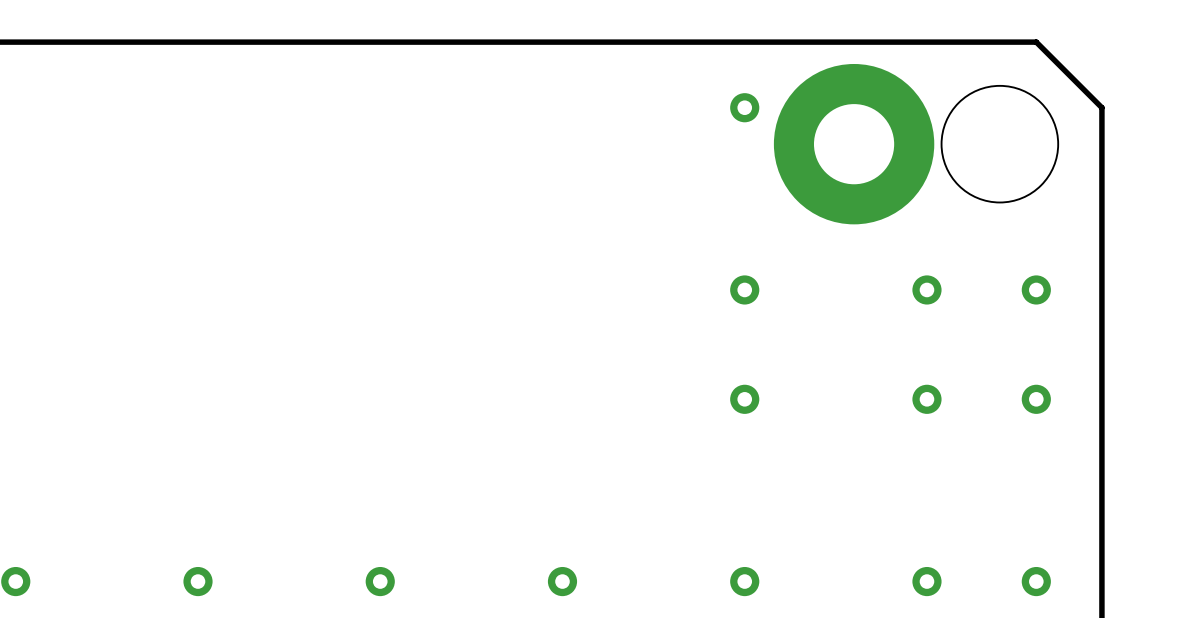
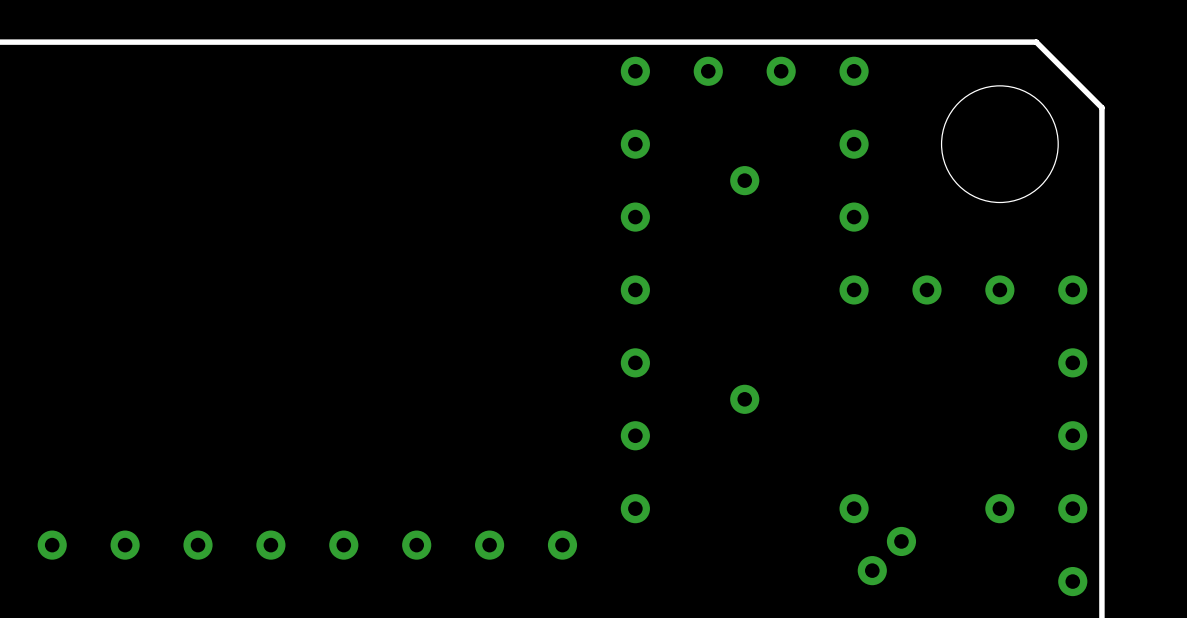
via: none -> (635, 71)
via: none -> (708, 71)
via: none -> (781, 71)
via: none -> (854, 71)
via: (744, 107) -> none
via: none -> (635, 144)
part: (854, 144) -> none
via: none -> (854, 144)
via: none -> (744, 180)
via: none -> (635, 217)
via: none -> (854, 217)
via: none -> (635, 289)
via: (744, 289) -> none
via: none -> (854, 289)
via: none -> (999, 289)
via: (1036, 289) -> none
via: none -> (1072, 289)
via: none -> (635, 362)
via: none -> (1072, 362)
via: (926, 399) -> none
via: (1036, 399) -> none
via: none -> (635, 435)
via: none -> (1072, 435)
via: none -> (635, 508)
via: none -> (854, 508)
via: none -> (999, 508)
via: none -> (1072, 508)
via: none -> (901, 541)
via: none -> (52, 545)
via: none -> (125, 545)
via: none -> (270, 545)
via: none -> (343, 545)
via: none -> (416, 545)
via: none -> (489, 545)
via: none -> (872, 570)
via: (15, 581) -> none
via position: (198, 581) -> (198, 545)
via: (380, 581) -> none
via position: (562, 581) -> (562, 545)
via: (744, 581) -> none
via: (926, 581) -> none
via position: (1036, 581) -> (1072, 581)

